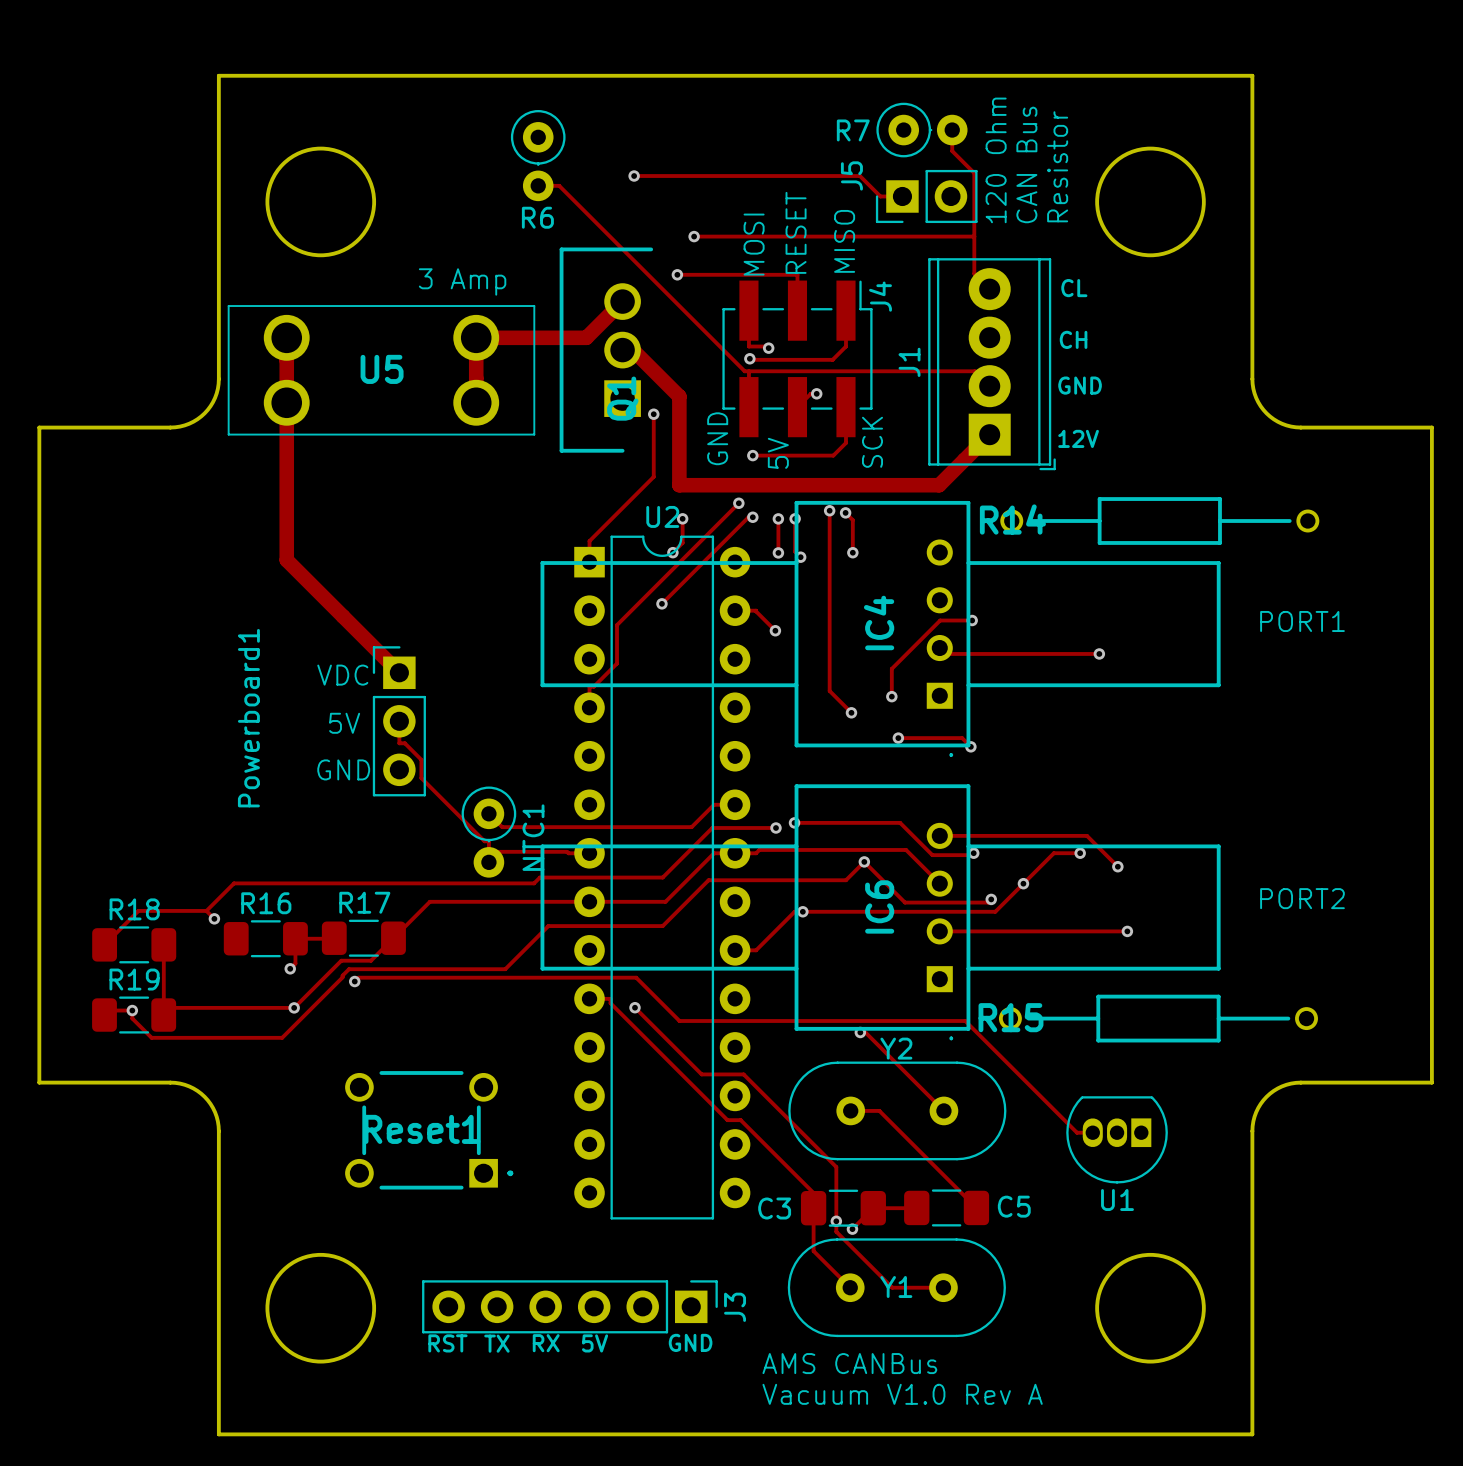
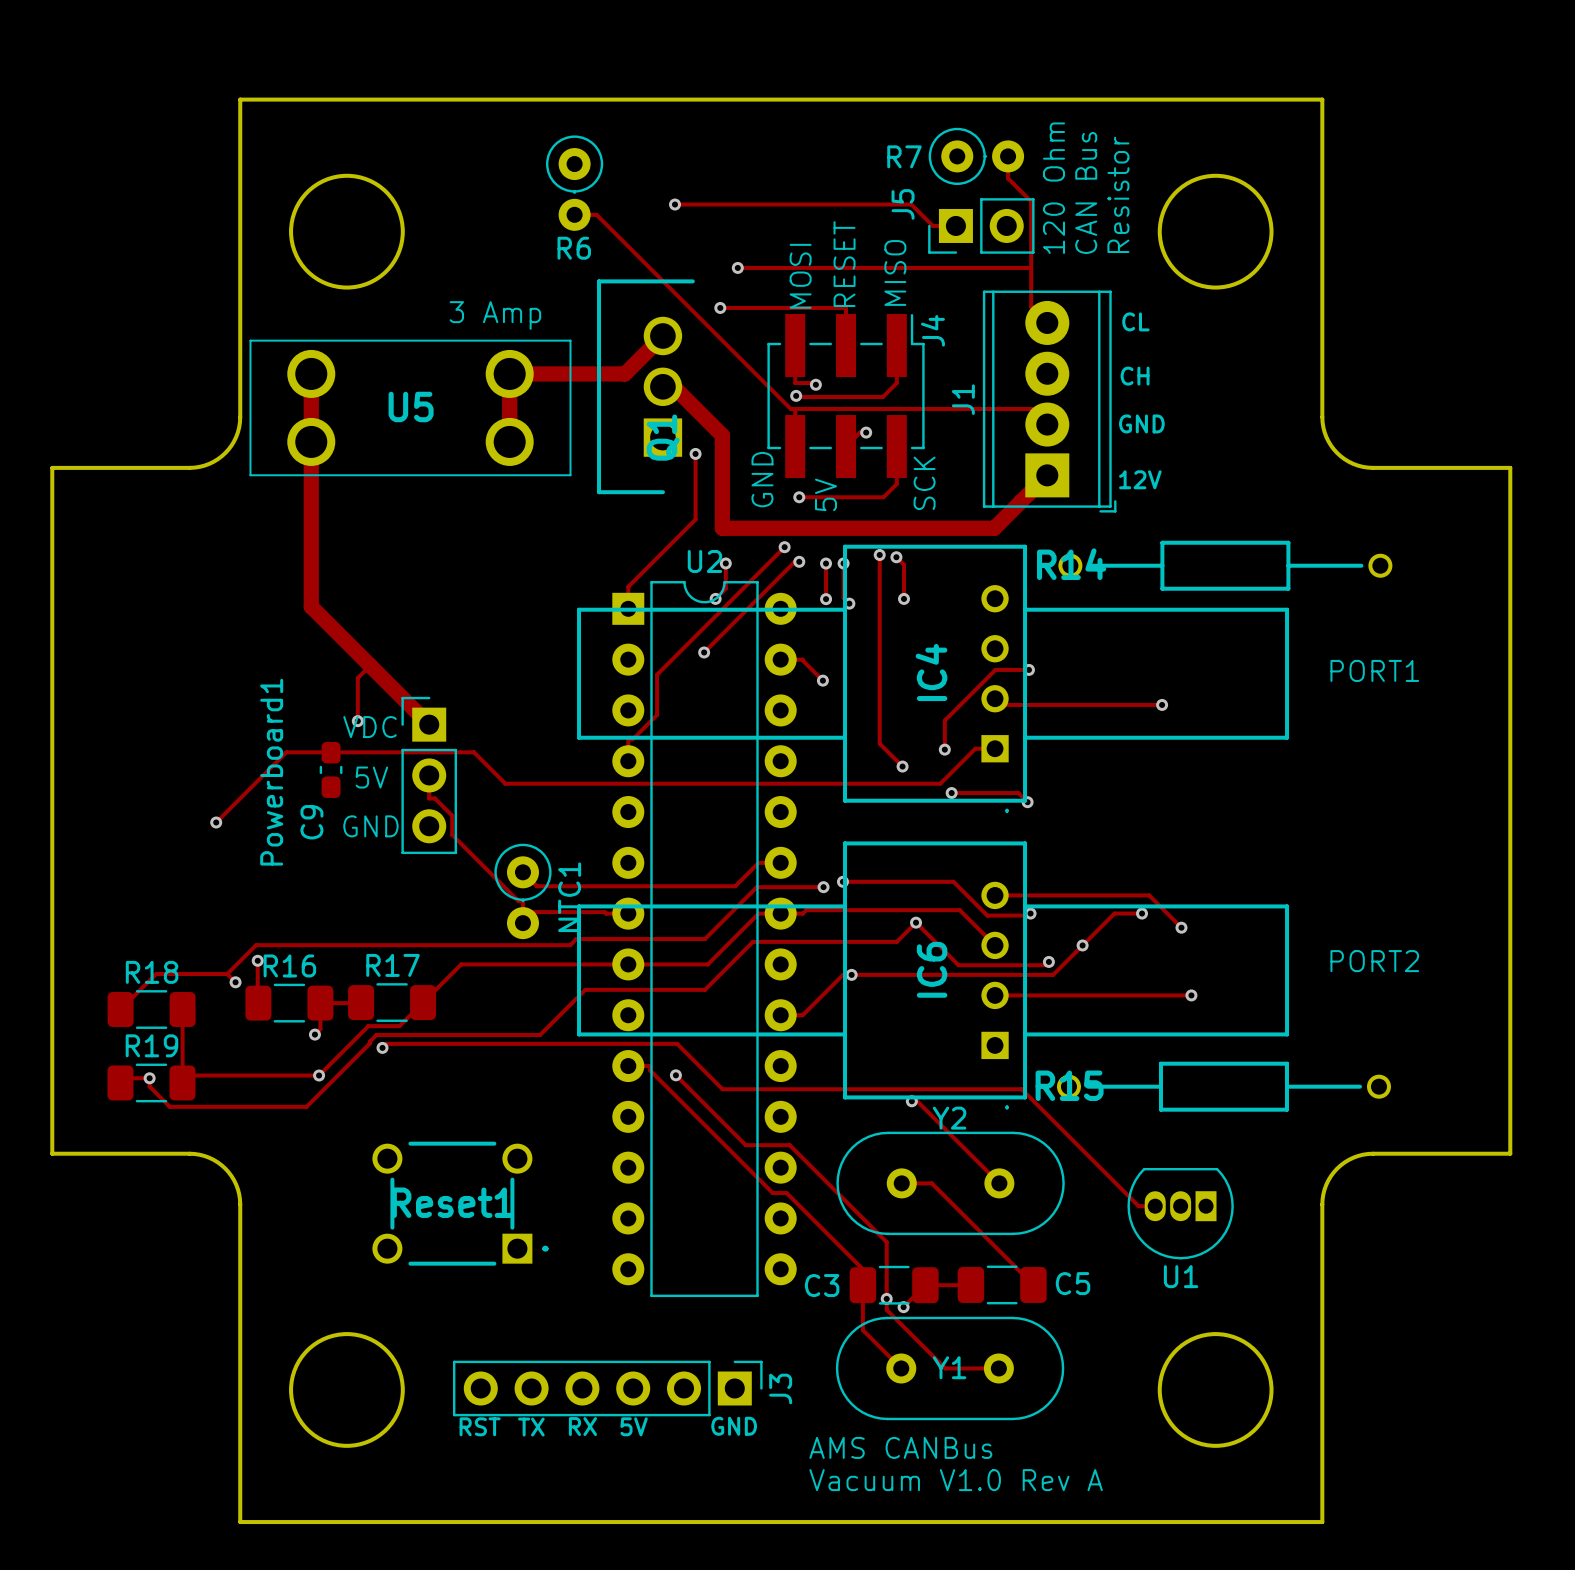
track: none -> (370, 665) (357, 678) (357, 721)
via: none -> (357, 721)
track: none -> (995, 748) (975, 748) (940, 783) (505, 783) (474, 752) (286, 752) (216, 822)
C9: none -> (331, 769)
via: none -> (216, 822)
track: none -> (257, 960) (258, 1003)
via: none -> (257, 960)

